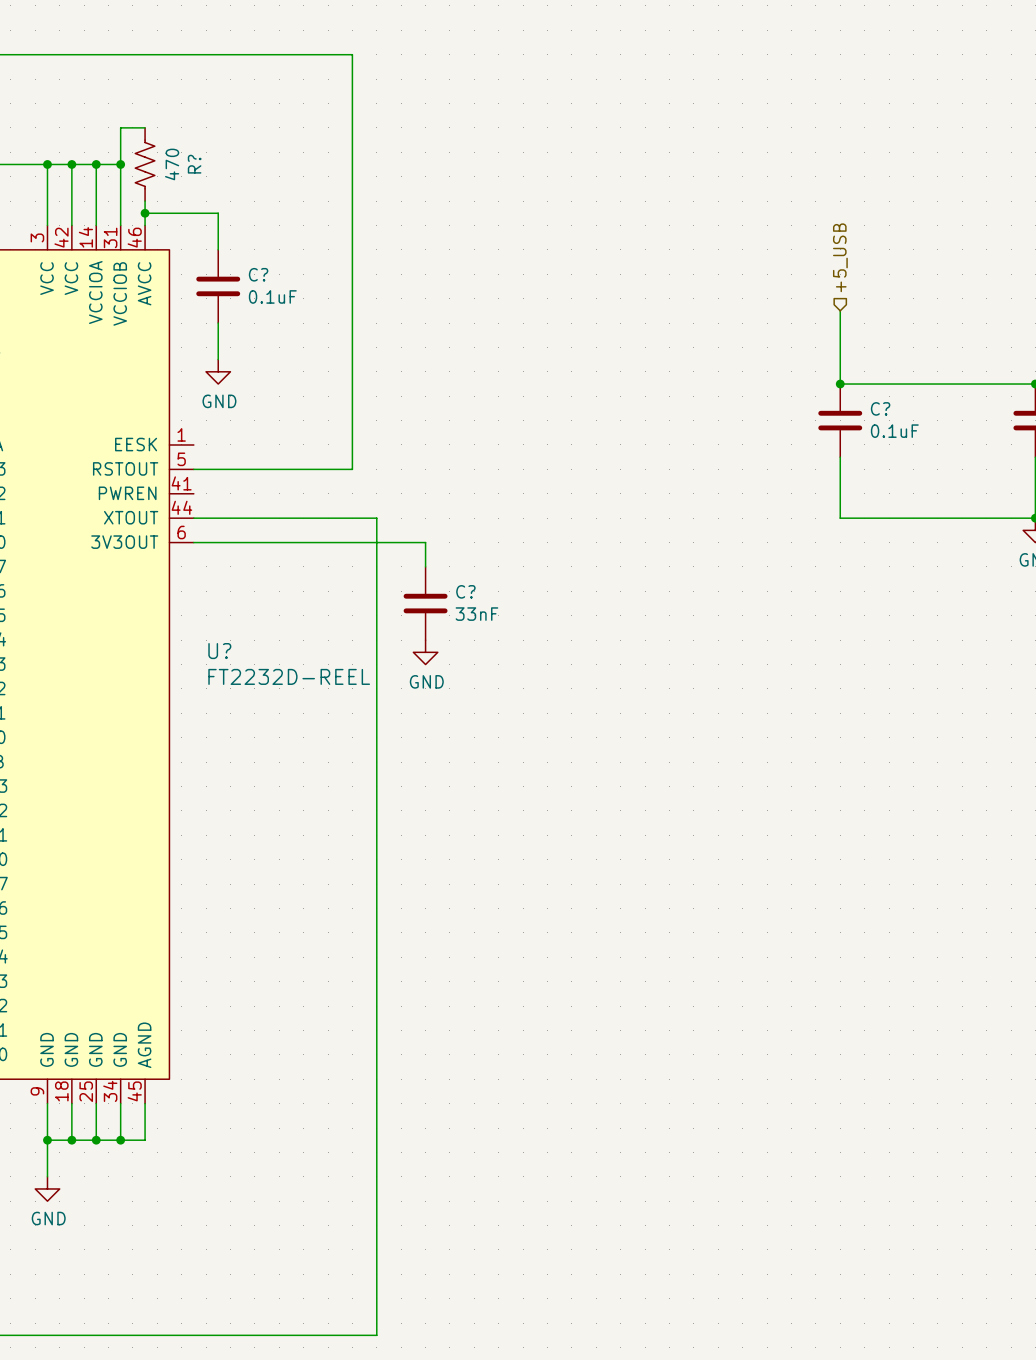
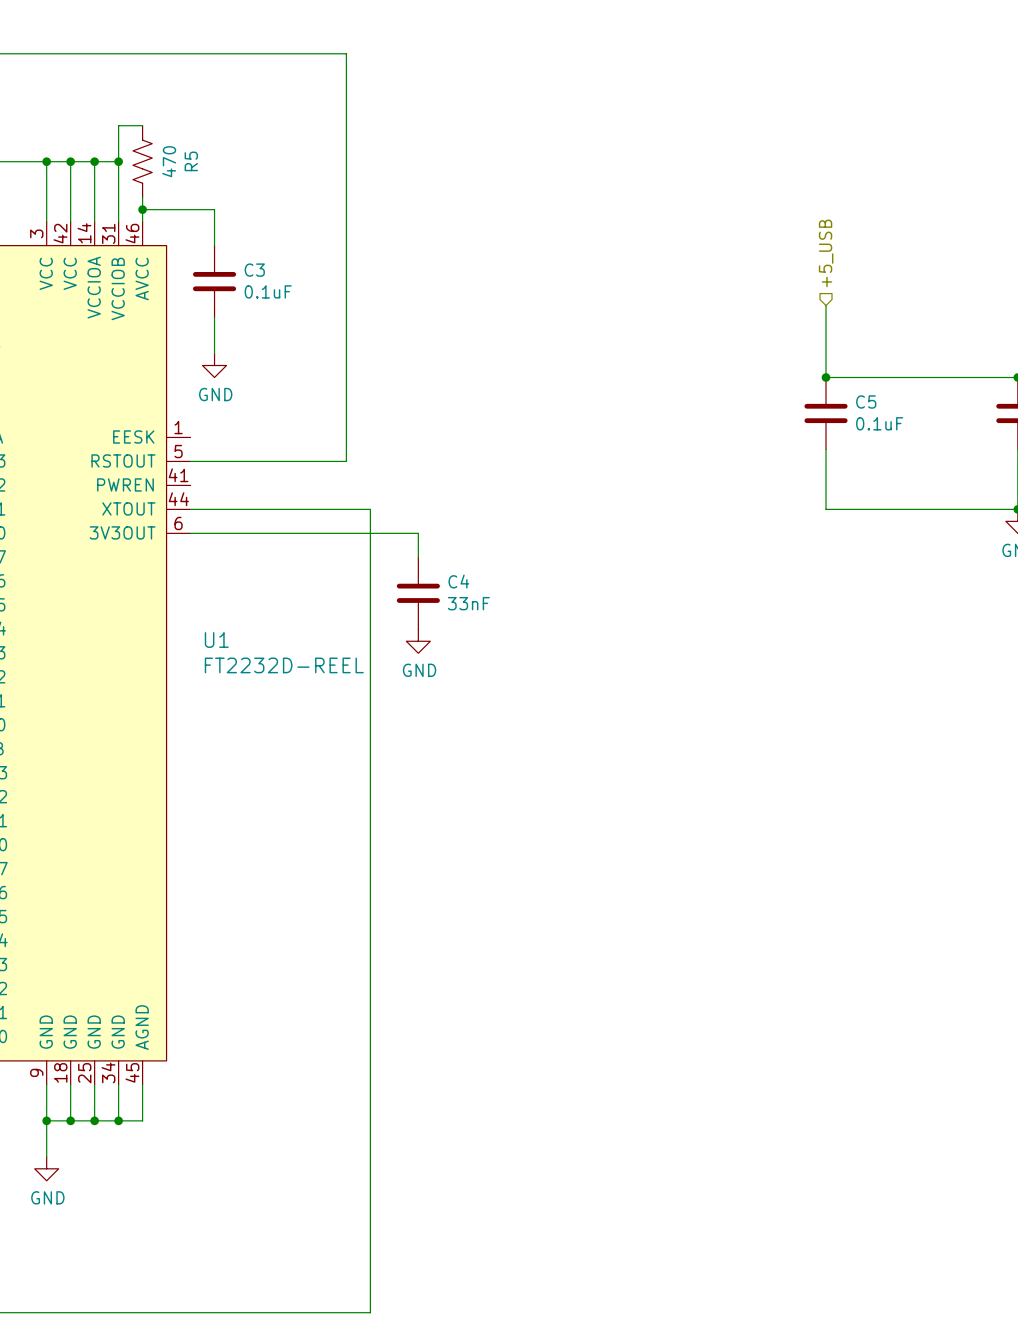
R? name: R? (194, 164) -> R5 (191, 161)
C? name: C? (258, 274) -> C3 (254, 270)
C? name: C? (880, 408) -> C5 (866, 401)
C? name: C? (465, 591) -> C4 (458, 581)
U? name: U? (219, 651) -> U1 (216, 640)

